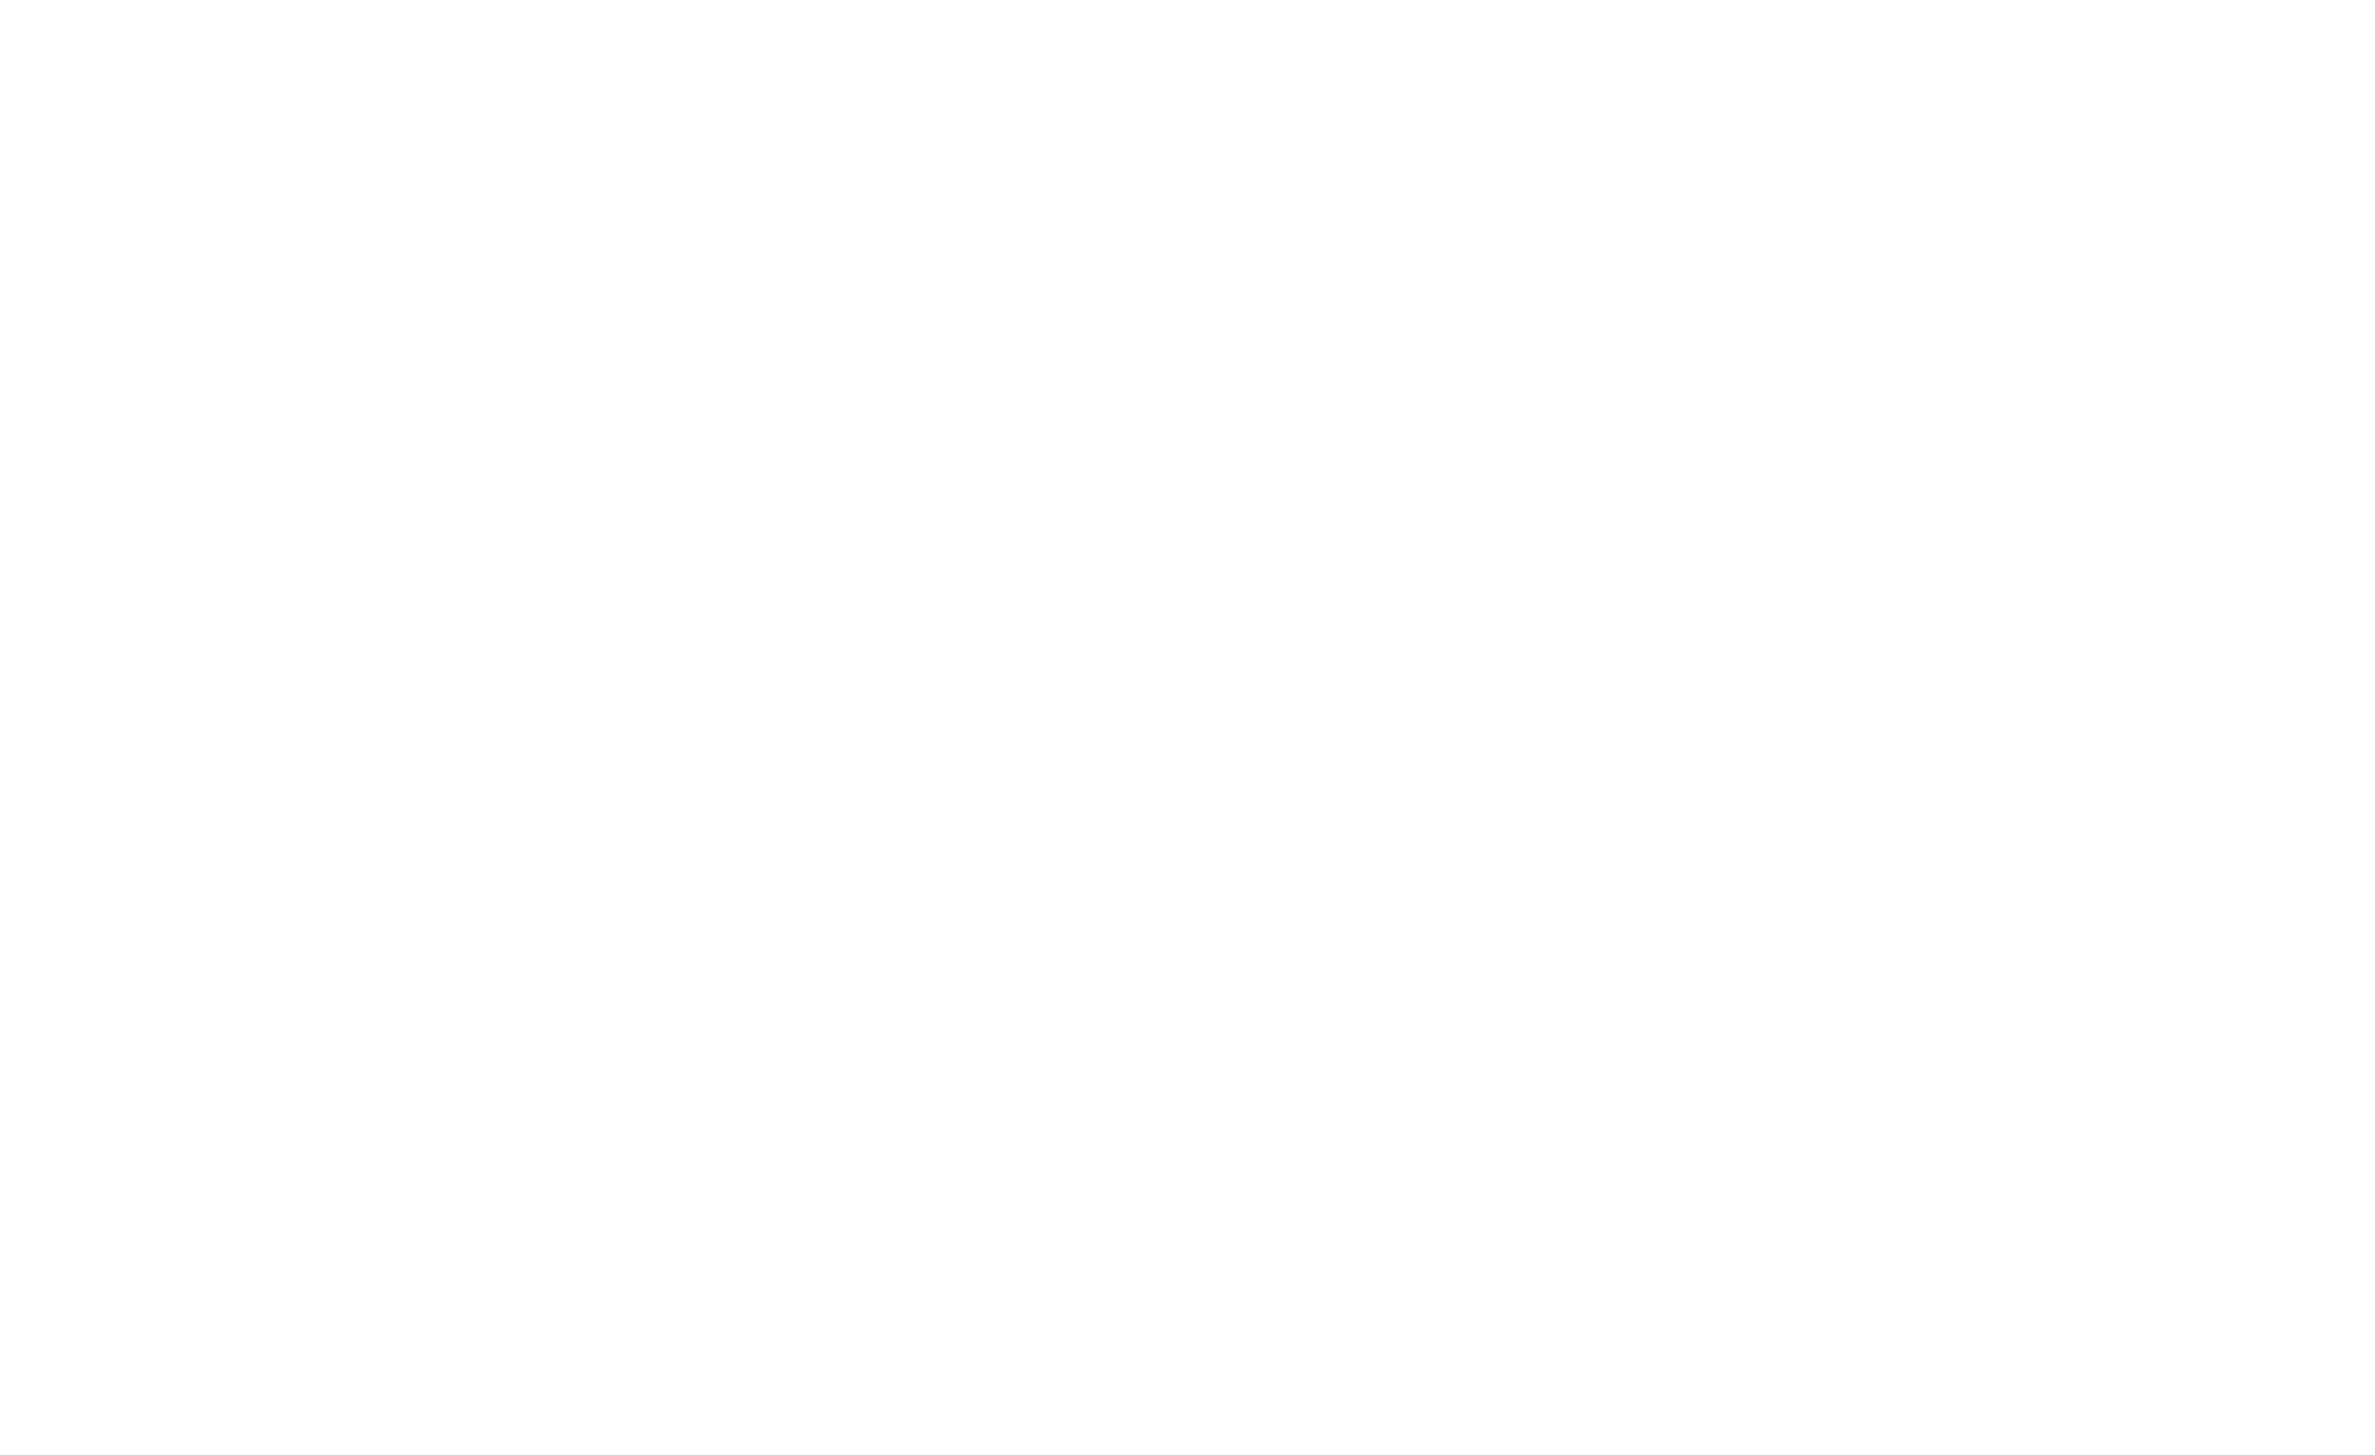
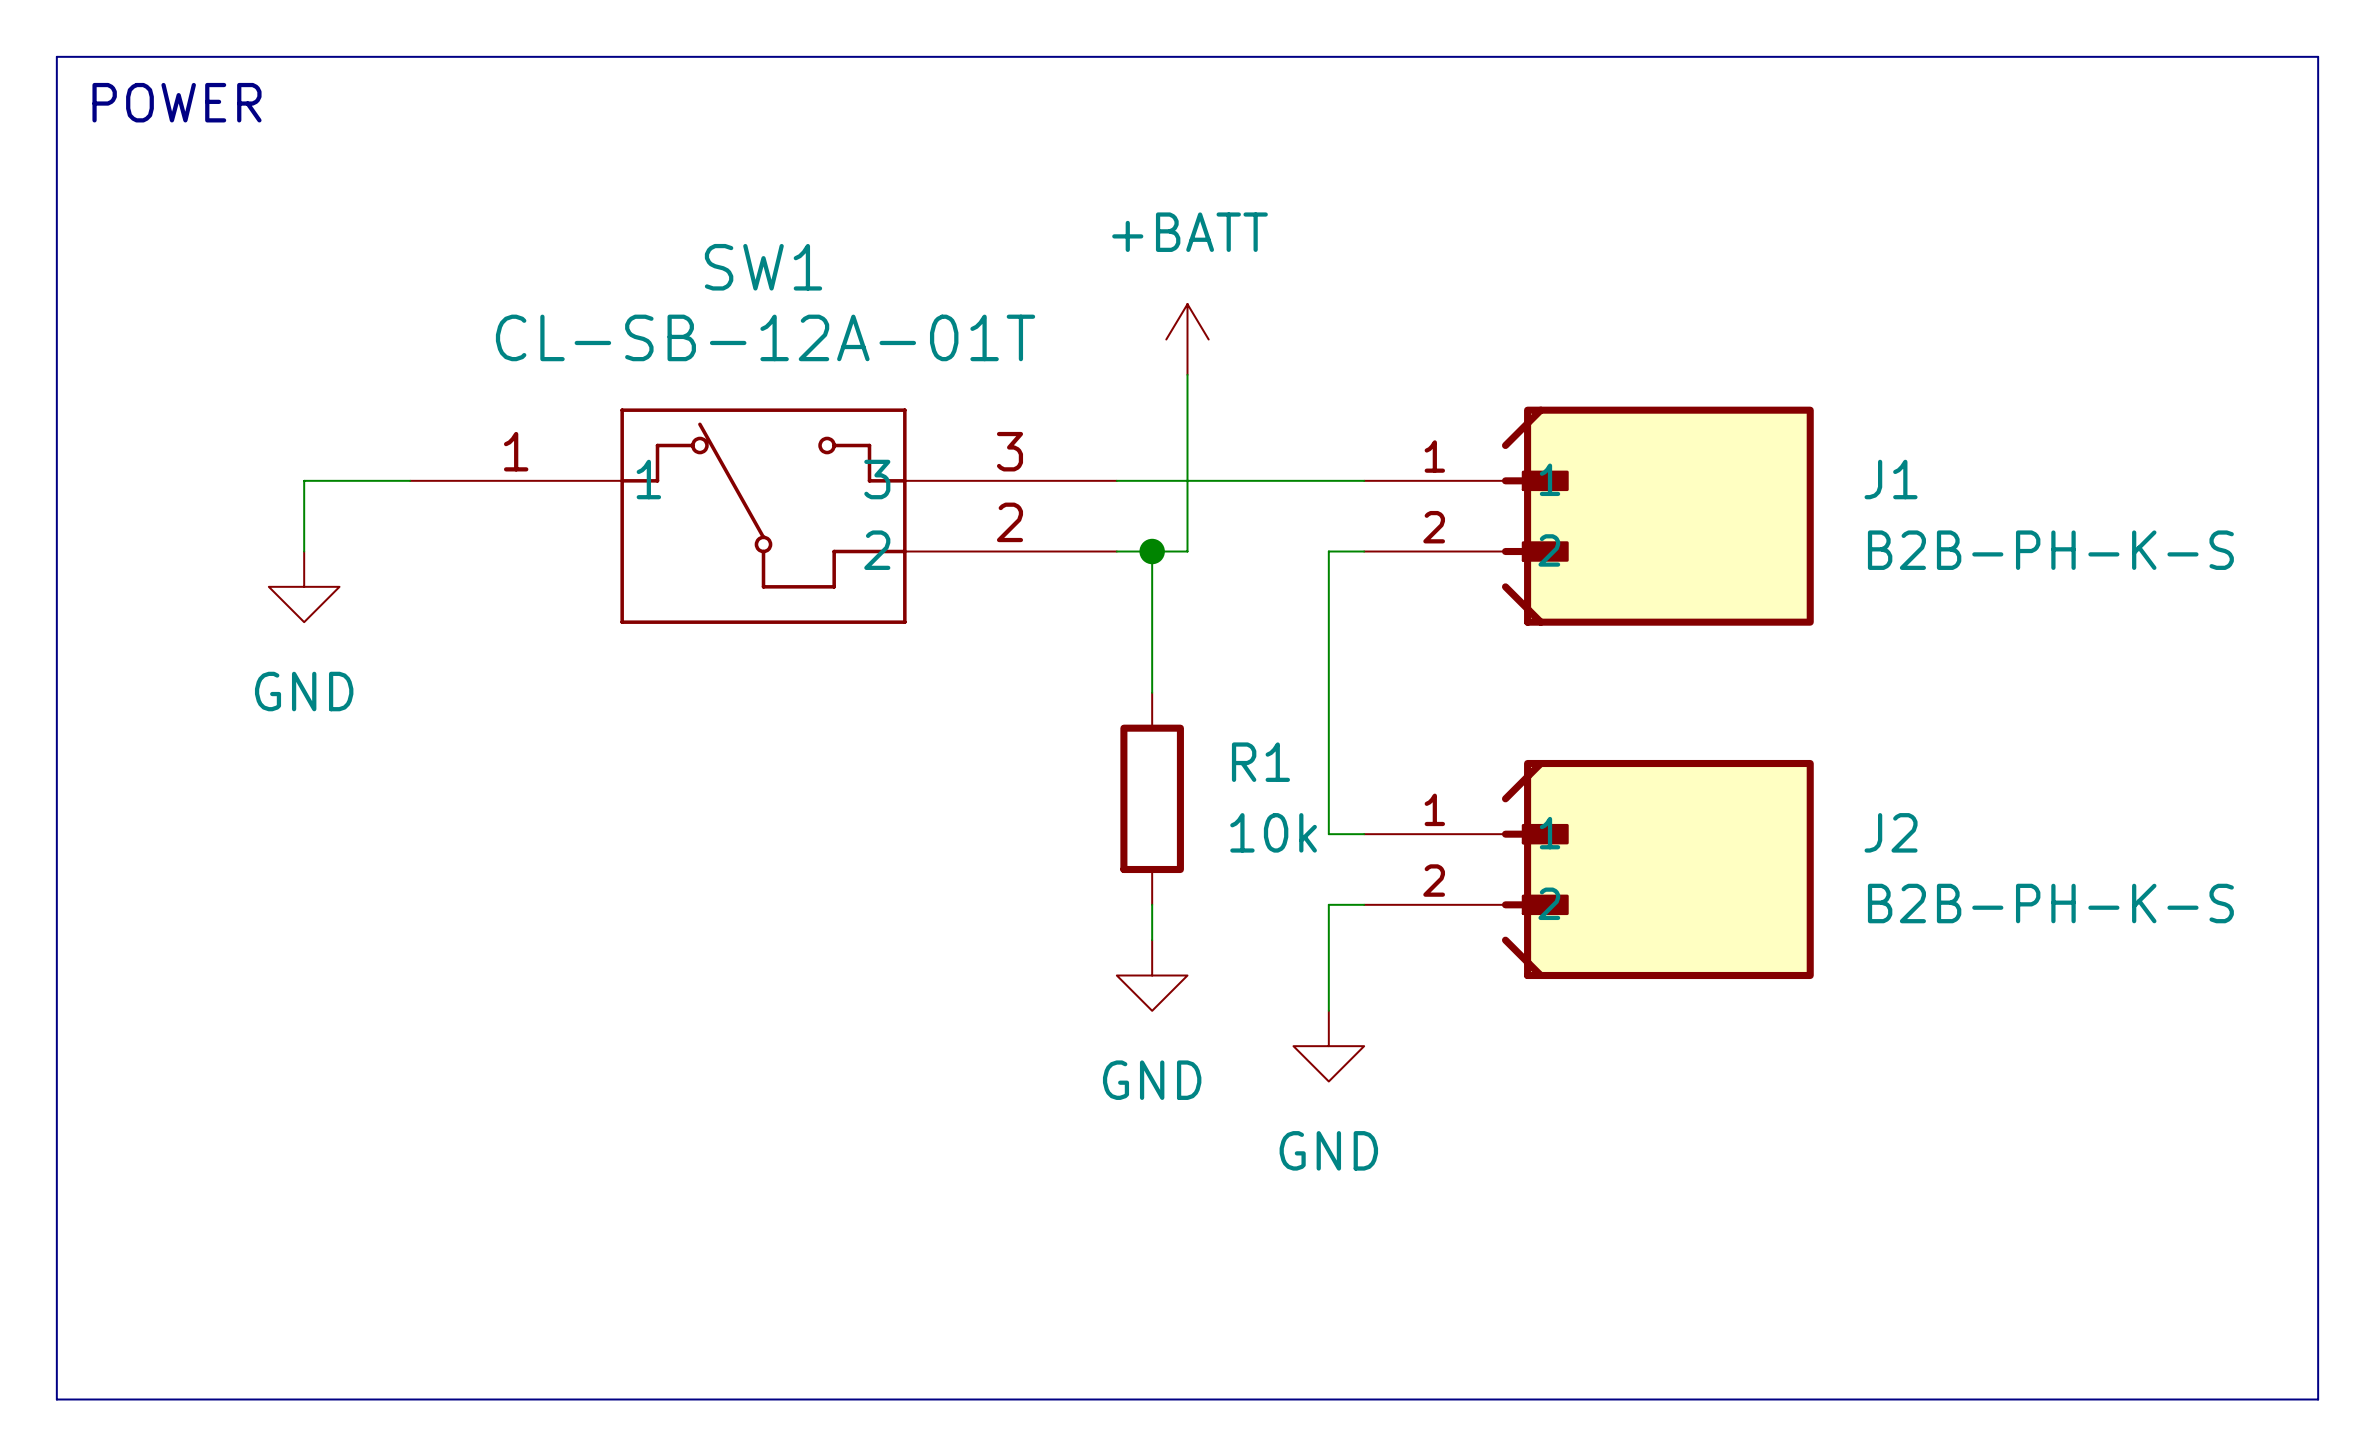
line: none -> (56, 56) (2318, 56) (2318, 1399) (56, 1399) (56, 56)
text: none -> POWER (176, 102)
power symbol: none -> +BATT (1187, 339)
wire: none -> (1187, 374) (1187, 551) (1116, 551)
wire: none -> (410, 480) (304, 480) (304, 551)
wire: none -> (1116, 480) (1364, 480)
SW1: none -> CL-SB-12A-01T (763, 516)
J1: none -> B2B-PH-K-S (1588, 516)
wire: none -> (1152, 551) (1152, 692)
junction: none -> (1152, 551)
wire: none -> (1364, 551) (1328, 551) (1328, 834) (1364, 834)
power symbol: none -> GND (304, 586)
R1: none -> 10k (1152, 798)
J2: none -> B2B-PH-K-S (1588, 869)
wire: none -> (1152, 904) (1152, 940)
wire: none -> (1364, 904) (1328, 904) (1328, 1010)
power symbol: none -> GND (1152, 975)
power symbol: none -> GND (1328, 1046)

